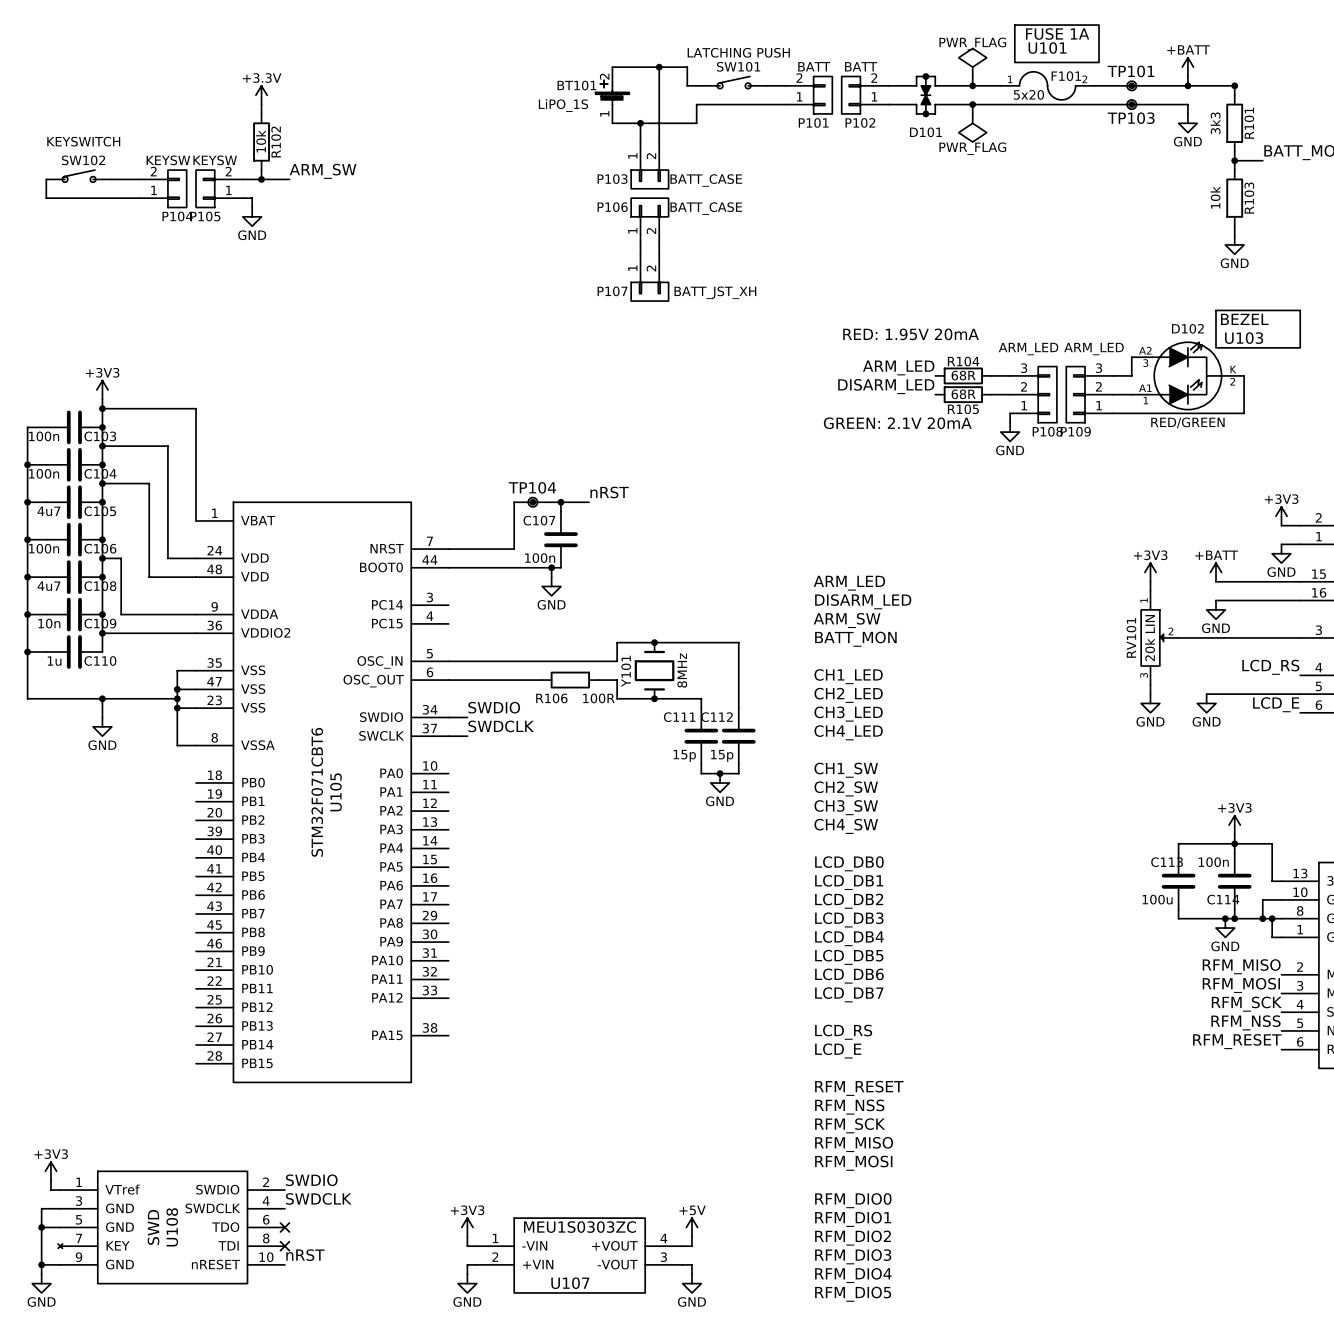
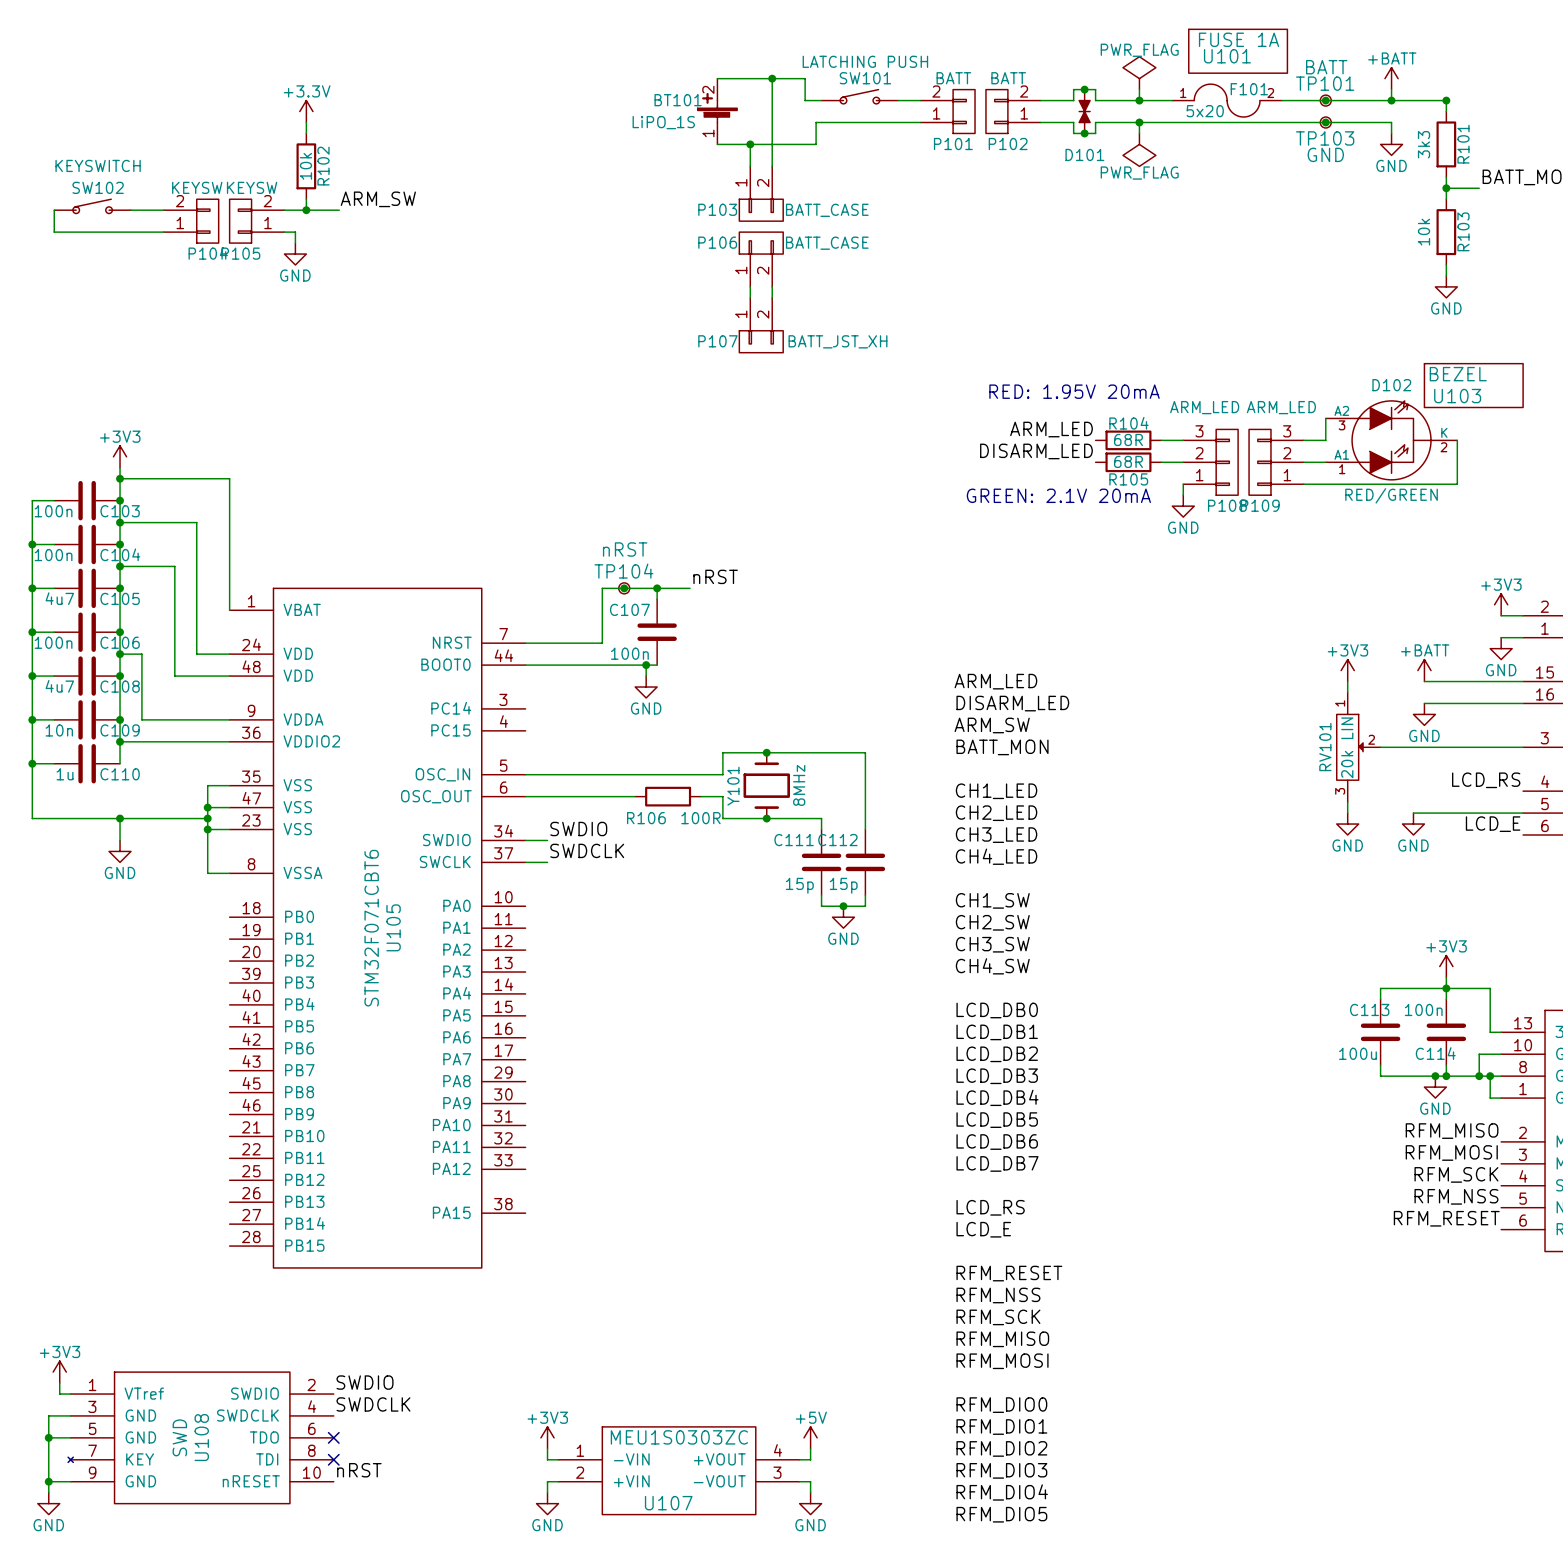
TP101 value: none -> BATT (1326, 67)
TP103 value: none -> GND (1325, 154)
TP104 value: none -> nRST (625, 549)

